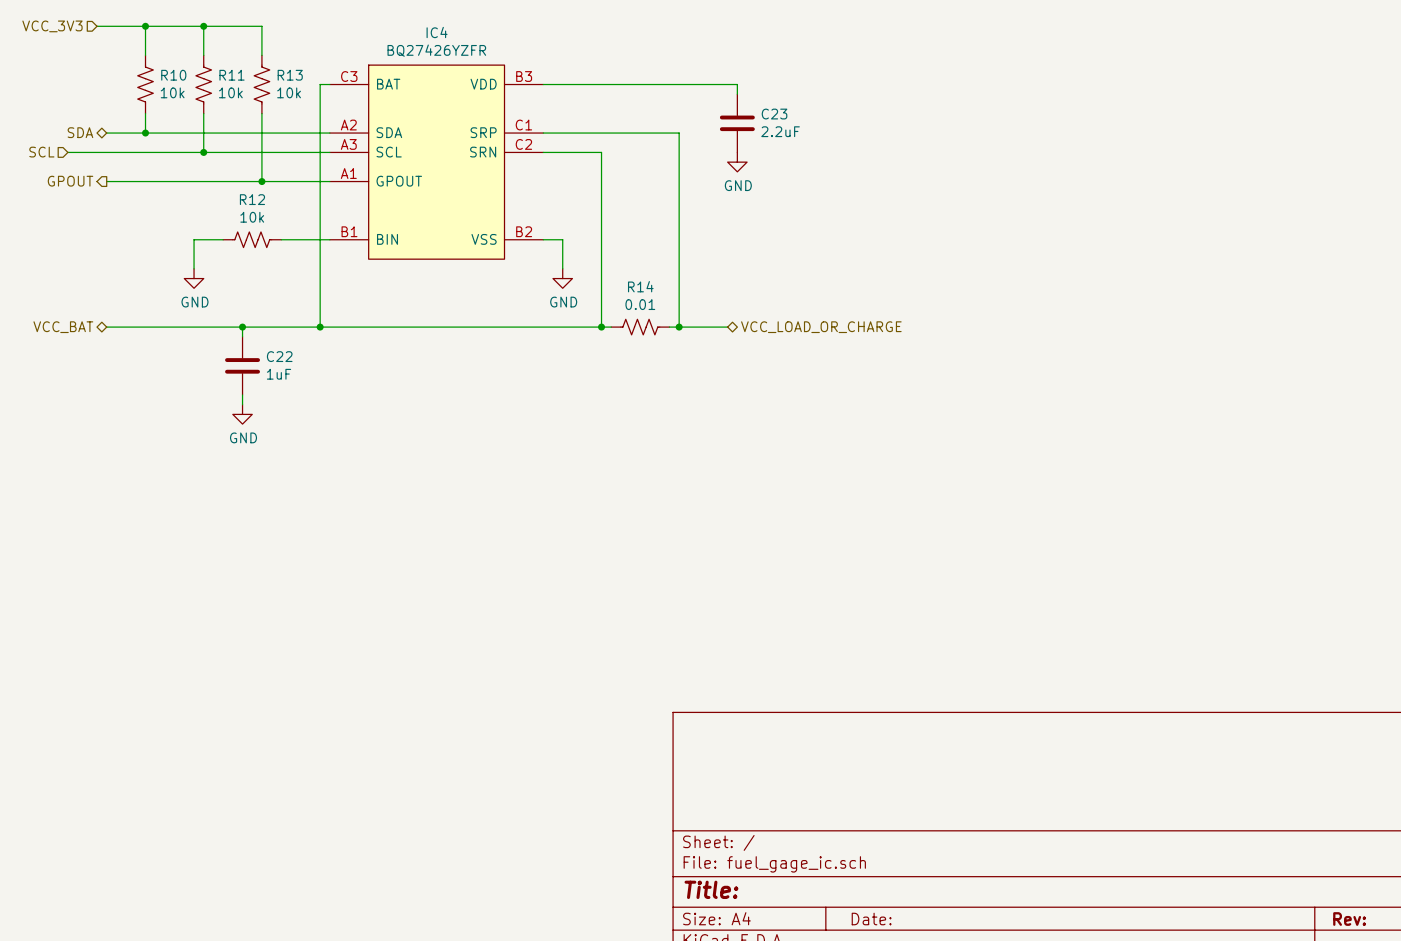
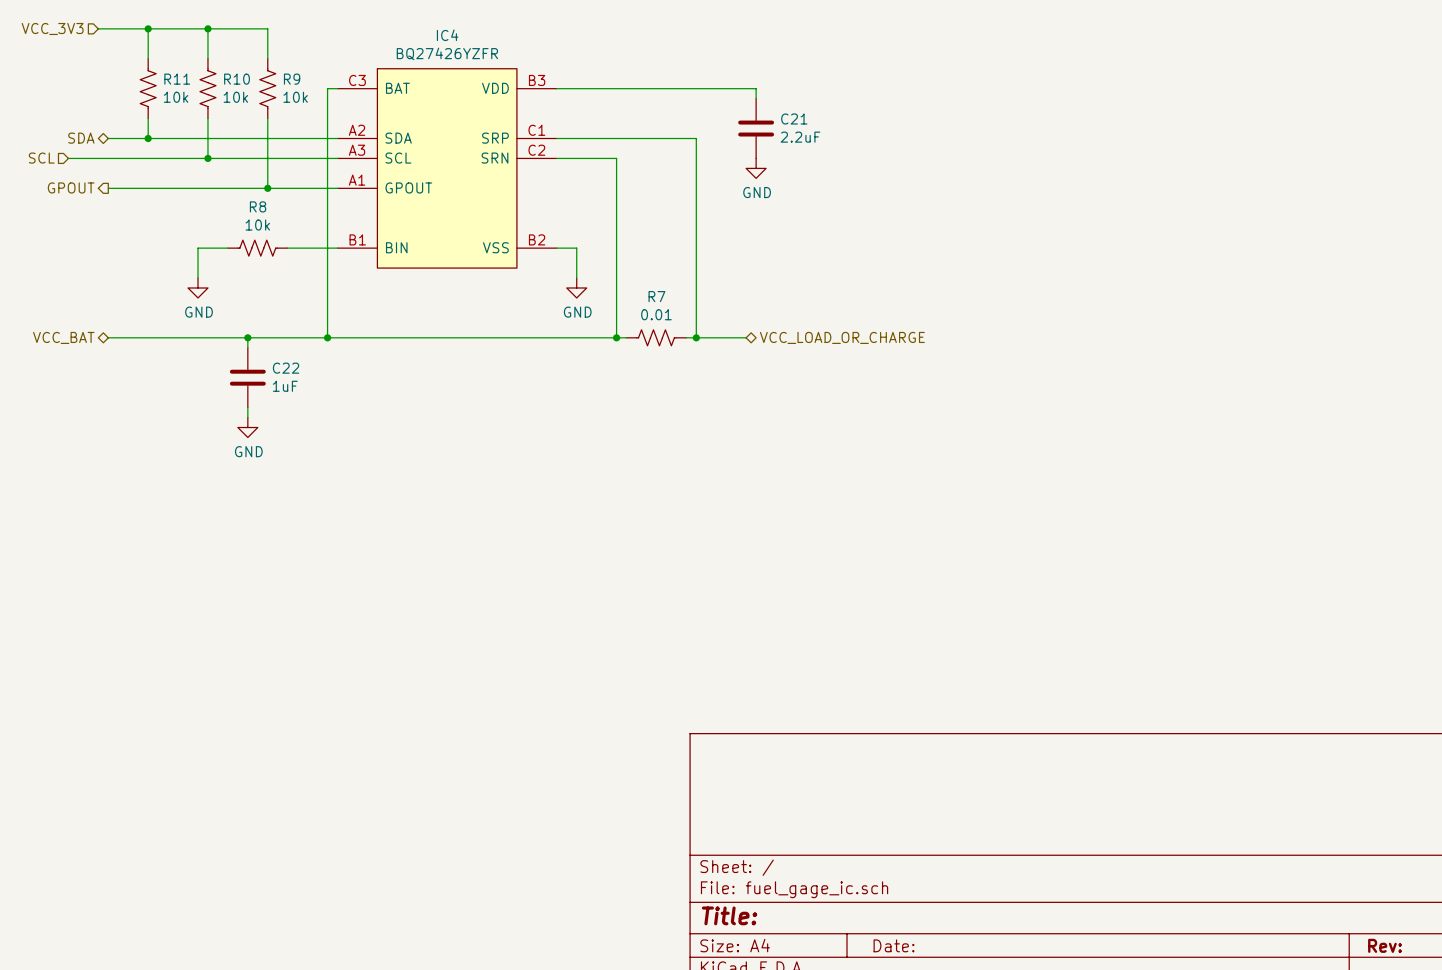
R10 name: R10 (173, 75) -> R11 (177, 79)
R11 name: R11 (232, 75) -> R10 (237, 79)
R13 name: R13 (290, 75) -> R9 (292, 79)
C23 name: C23 (774, 114) -> C21 (794, 119)
R12 name: R12 (252, 199) -> R8 (258, 206)
R14 name: R14 (640, 286) -> R7 (656, 296)

